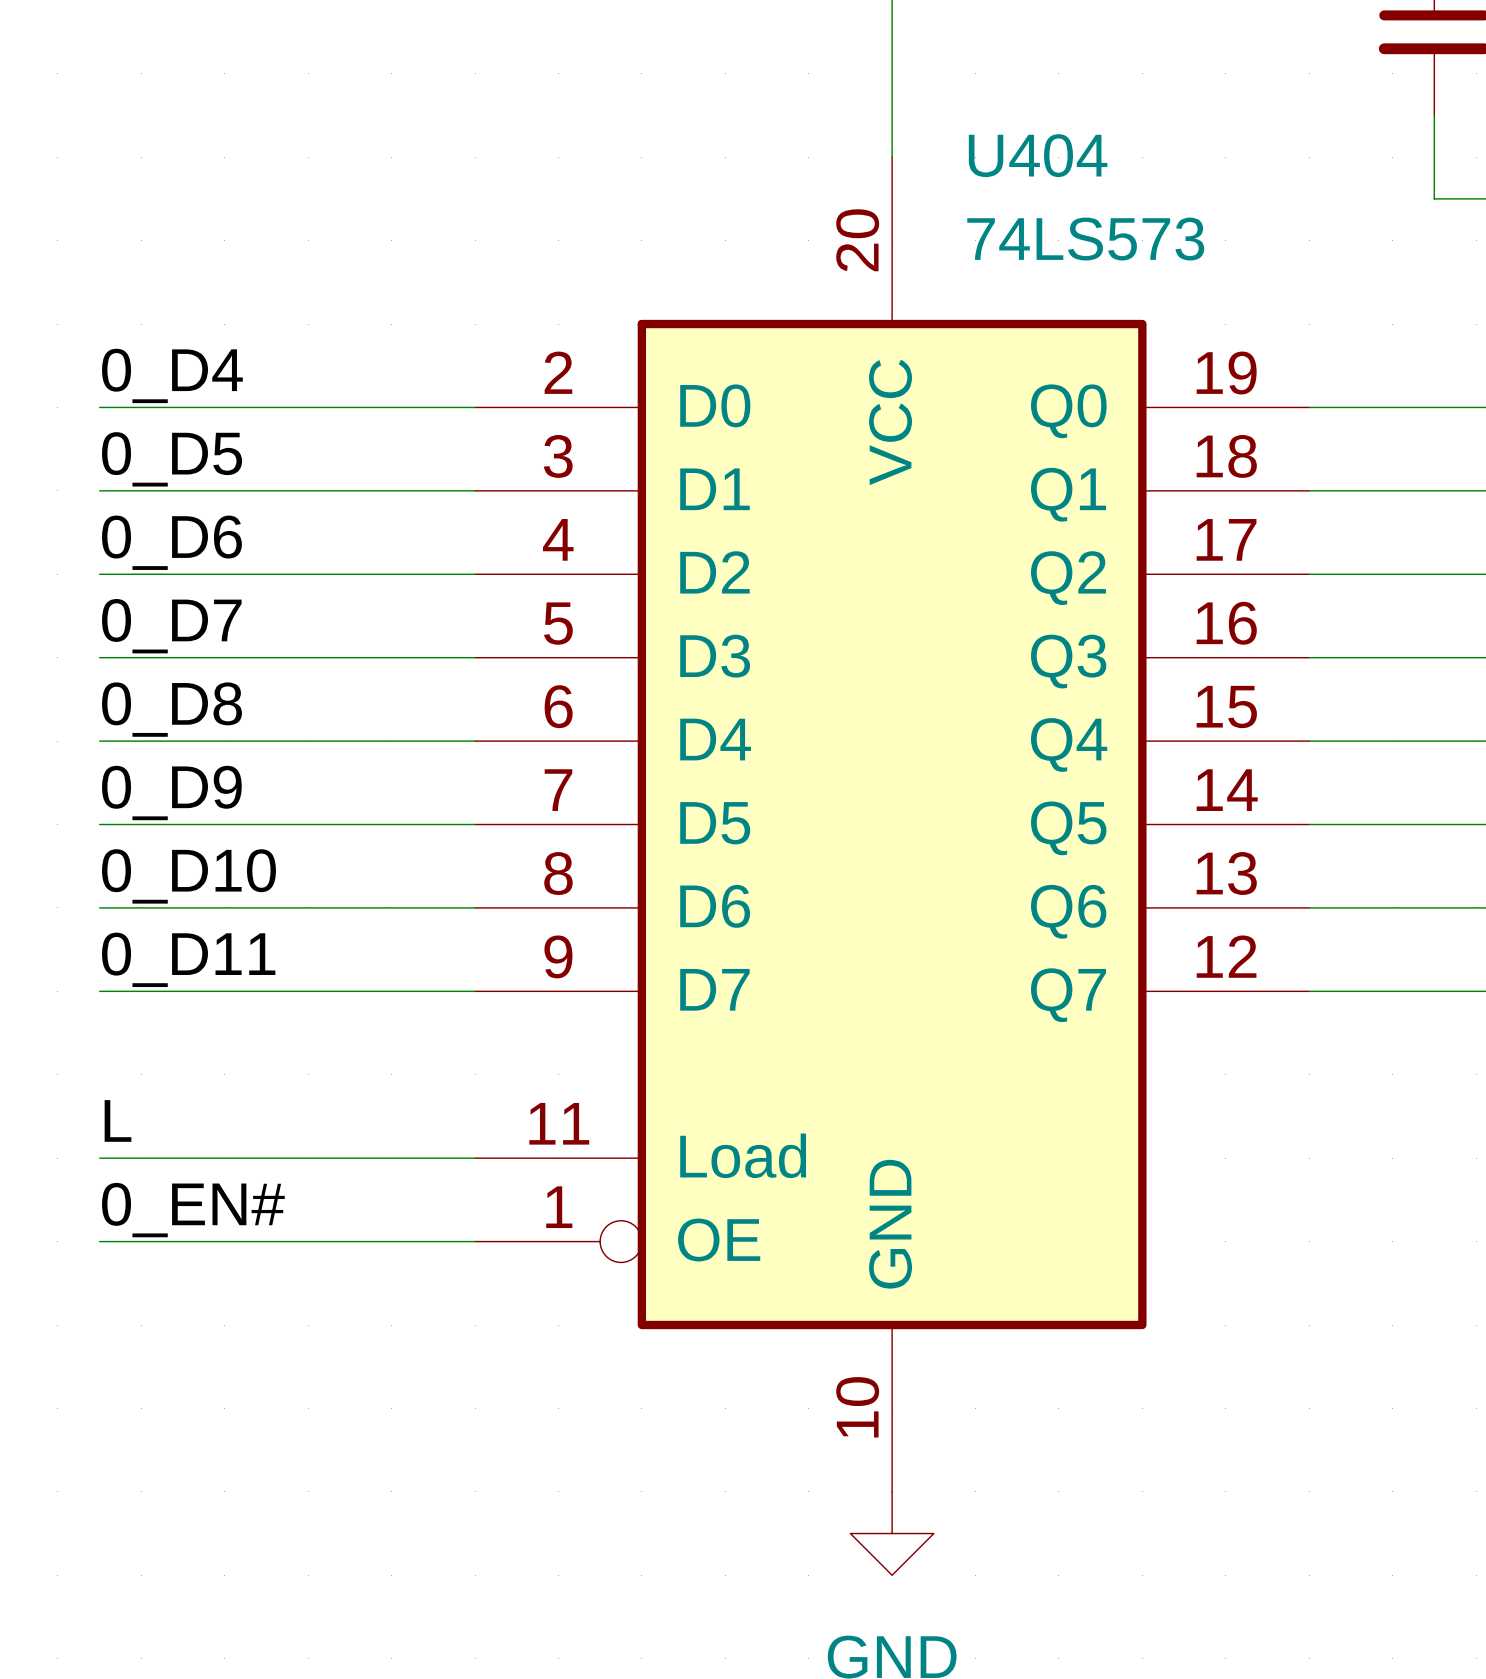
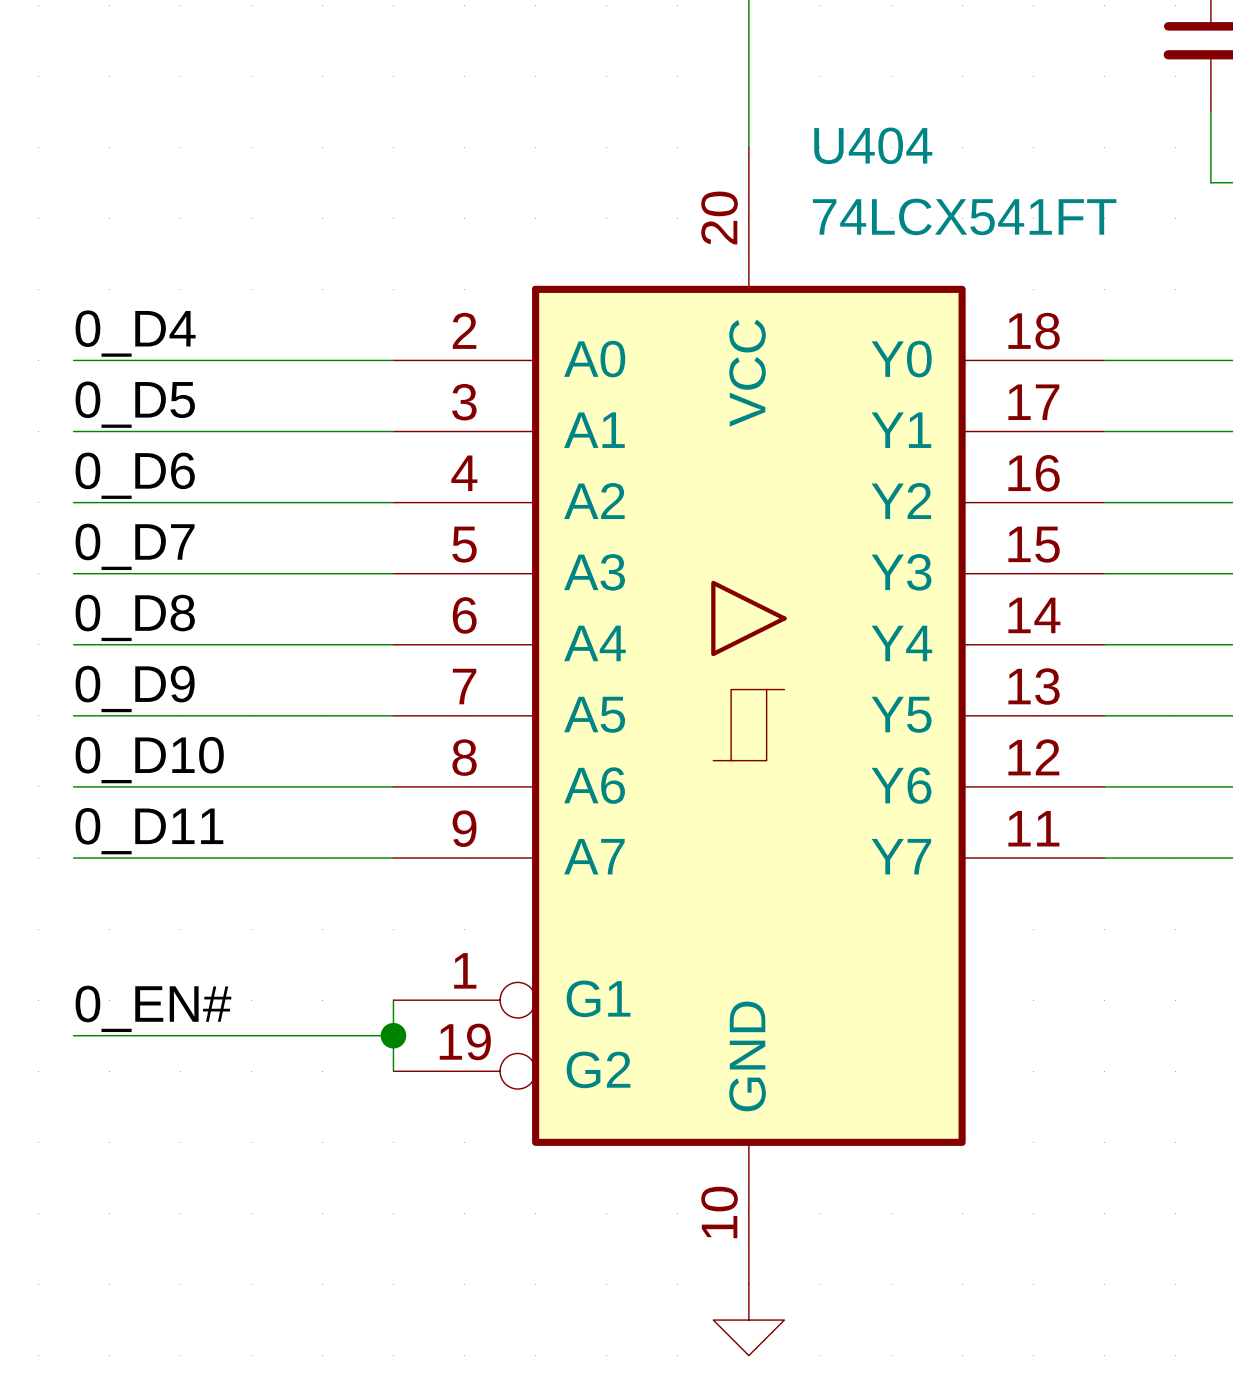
U404 symbol: [475, 157, 1310, 1492] -> [393, 147, 1105, 1285]
U404 value: 74LS573 (1085, 239) -> 74LCX541FT (964, 216)
label: L (118, 1120) -> none
wire: (99, 1158) (475, 1158) -> (393, 1071) (393, 1000)
junction: none -> (393, 1035)
label position: 0_EN# (193, 1210) -> 0_EN# (153, 1008)
wire: (99, 1241) (475, 1241) -> (73, 1035) (393, 1035)

